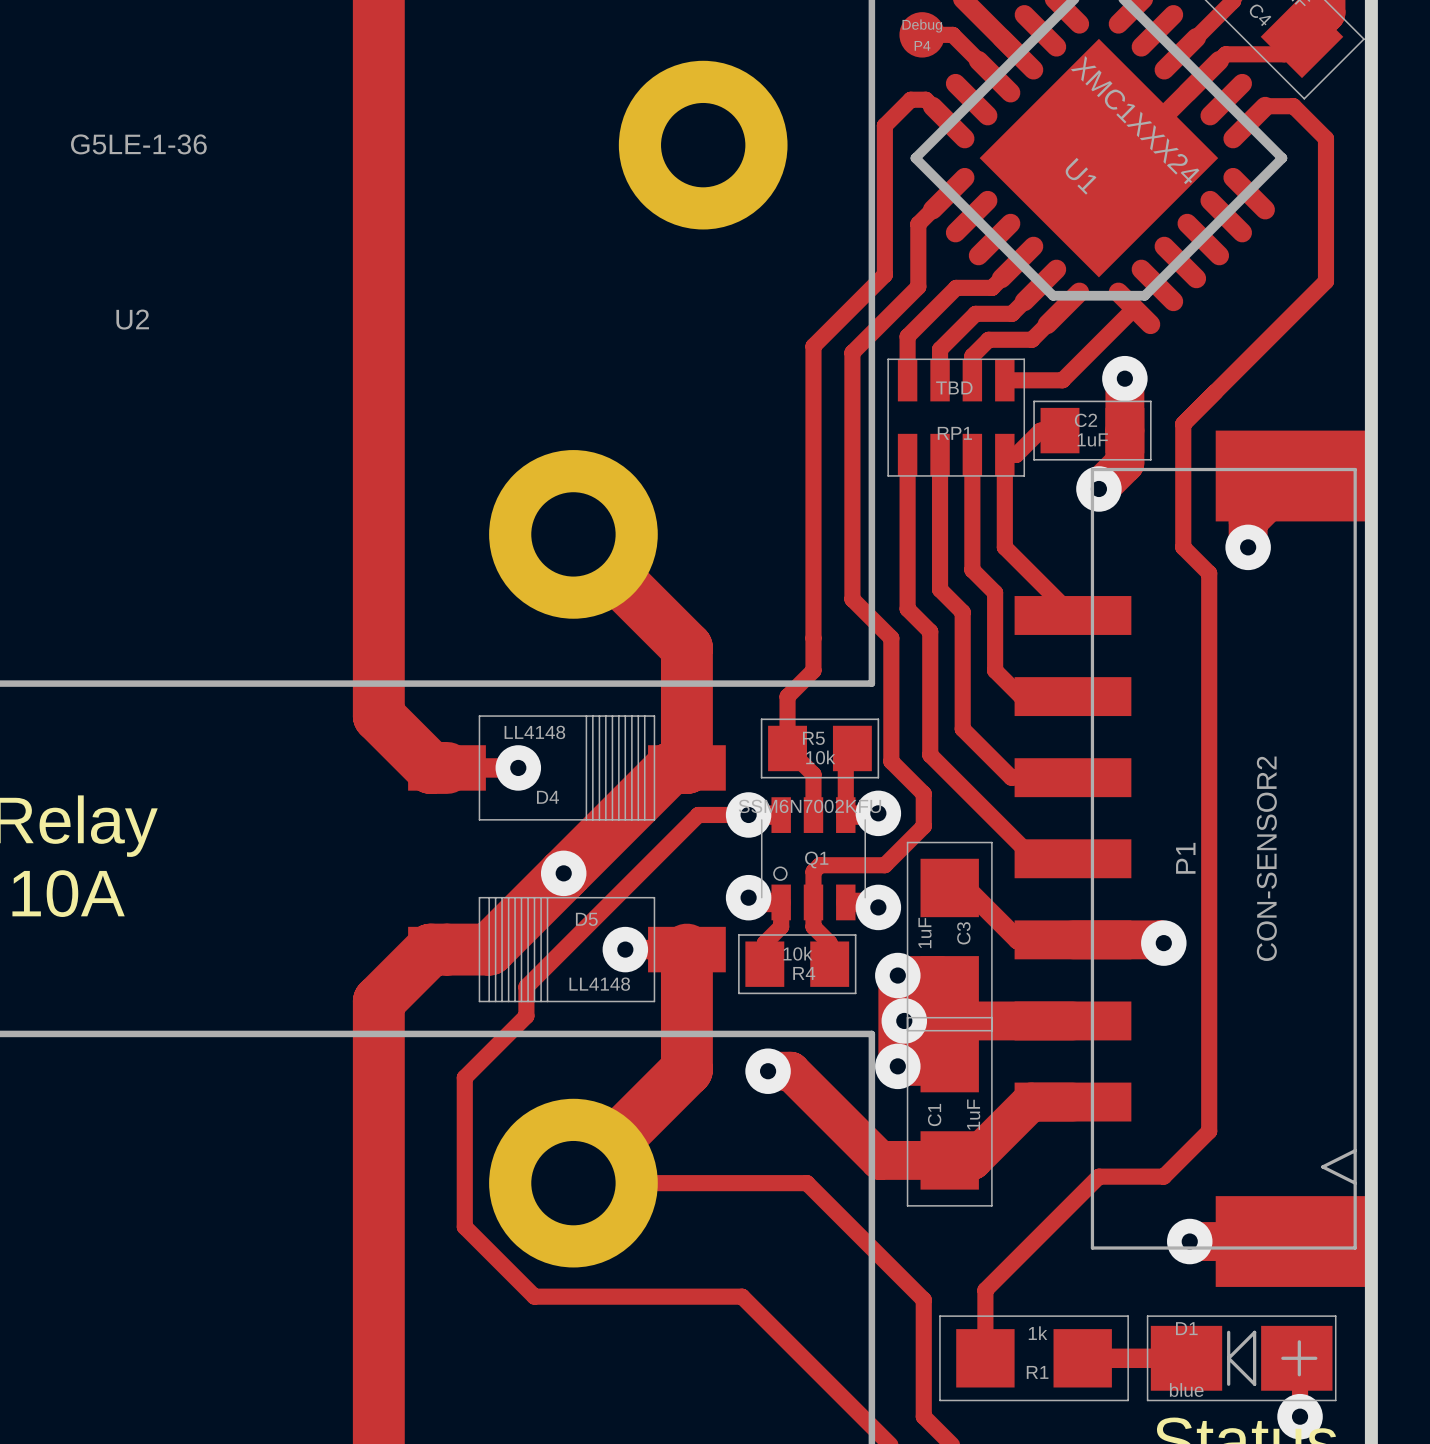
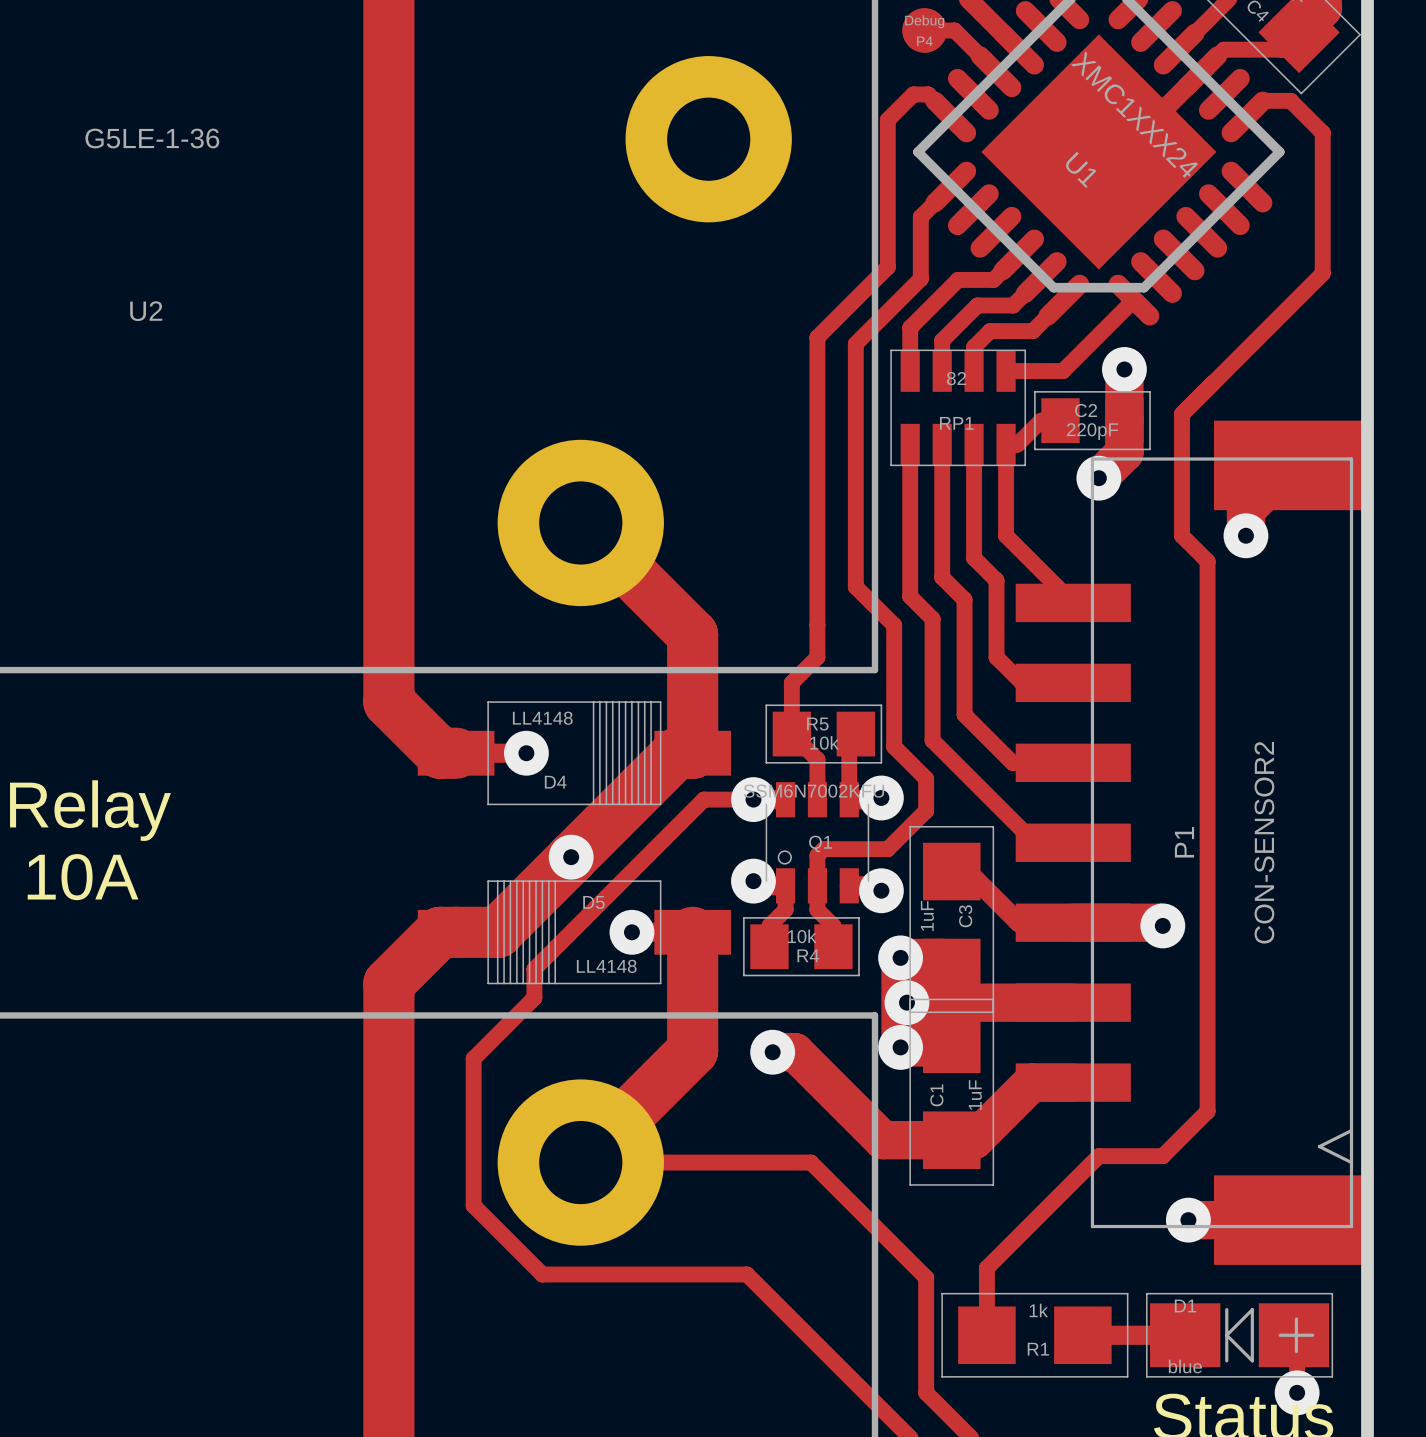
RP1 value: TBD (954, 387) -> 82 (956, 378)
C2 value: 1uF (1092, 439) -> 220pF (1092, 431)

